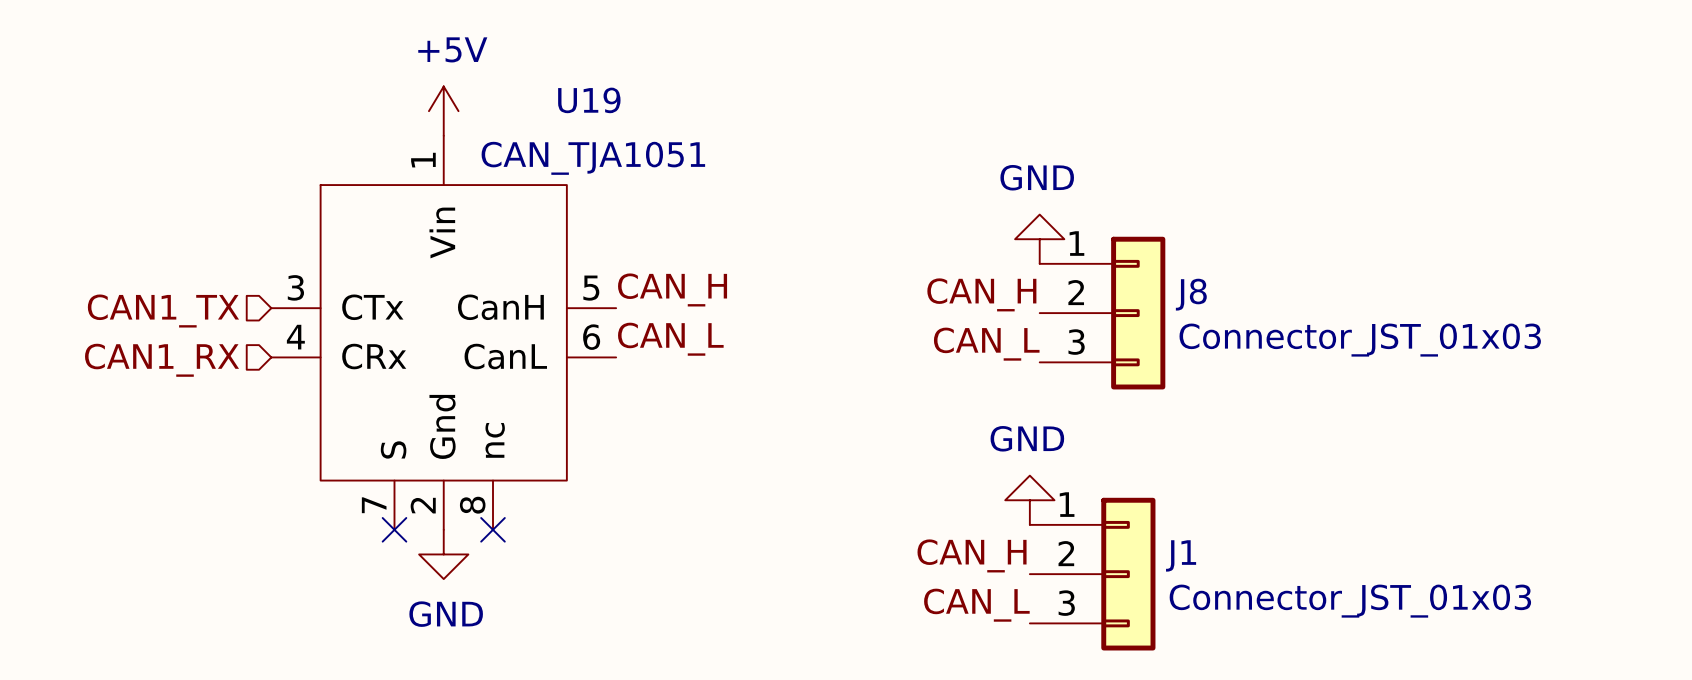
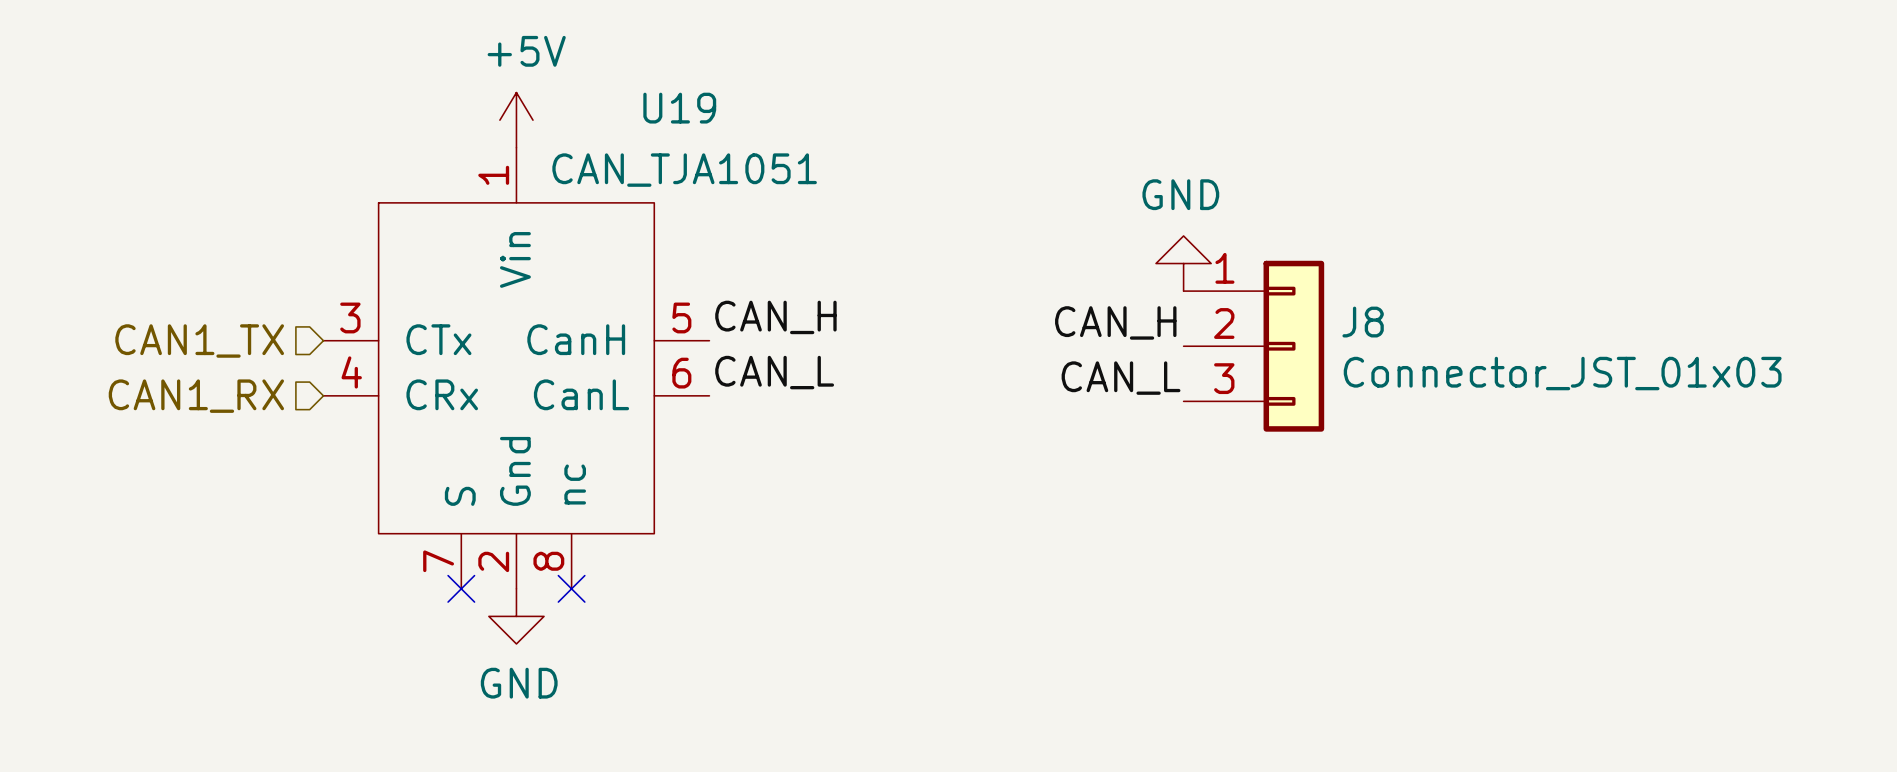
power symbol: GND (1029, 500) -> none
label: CAN_H (972, 555) -> none
J1: Connector_JST_01x03 (1092, 574) -> none
label: CAN_L (976, 605) -> none

